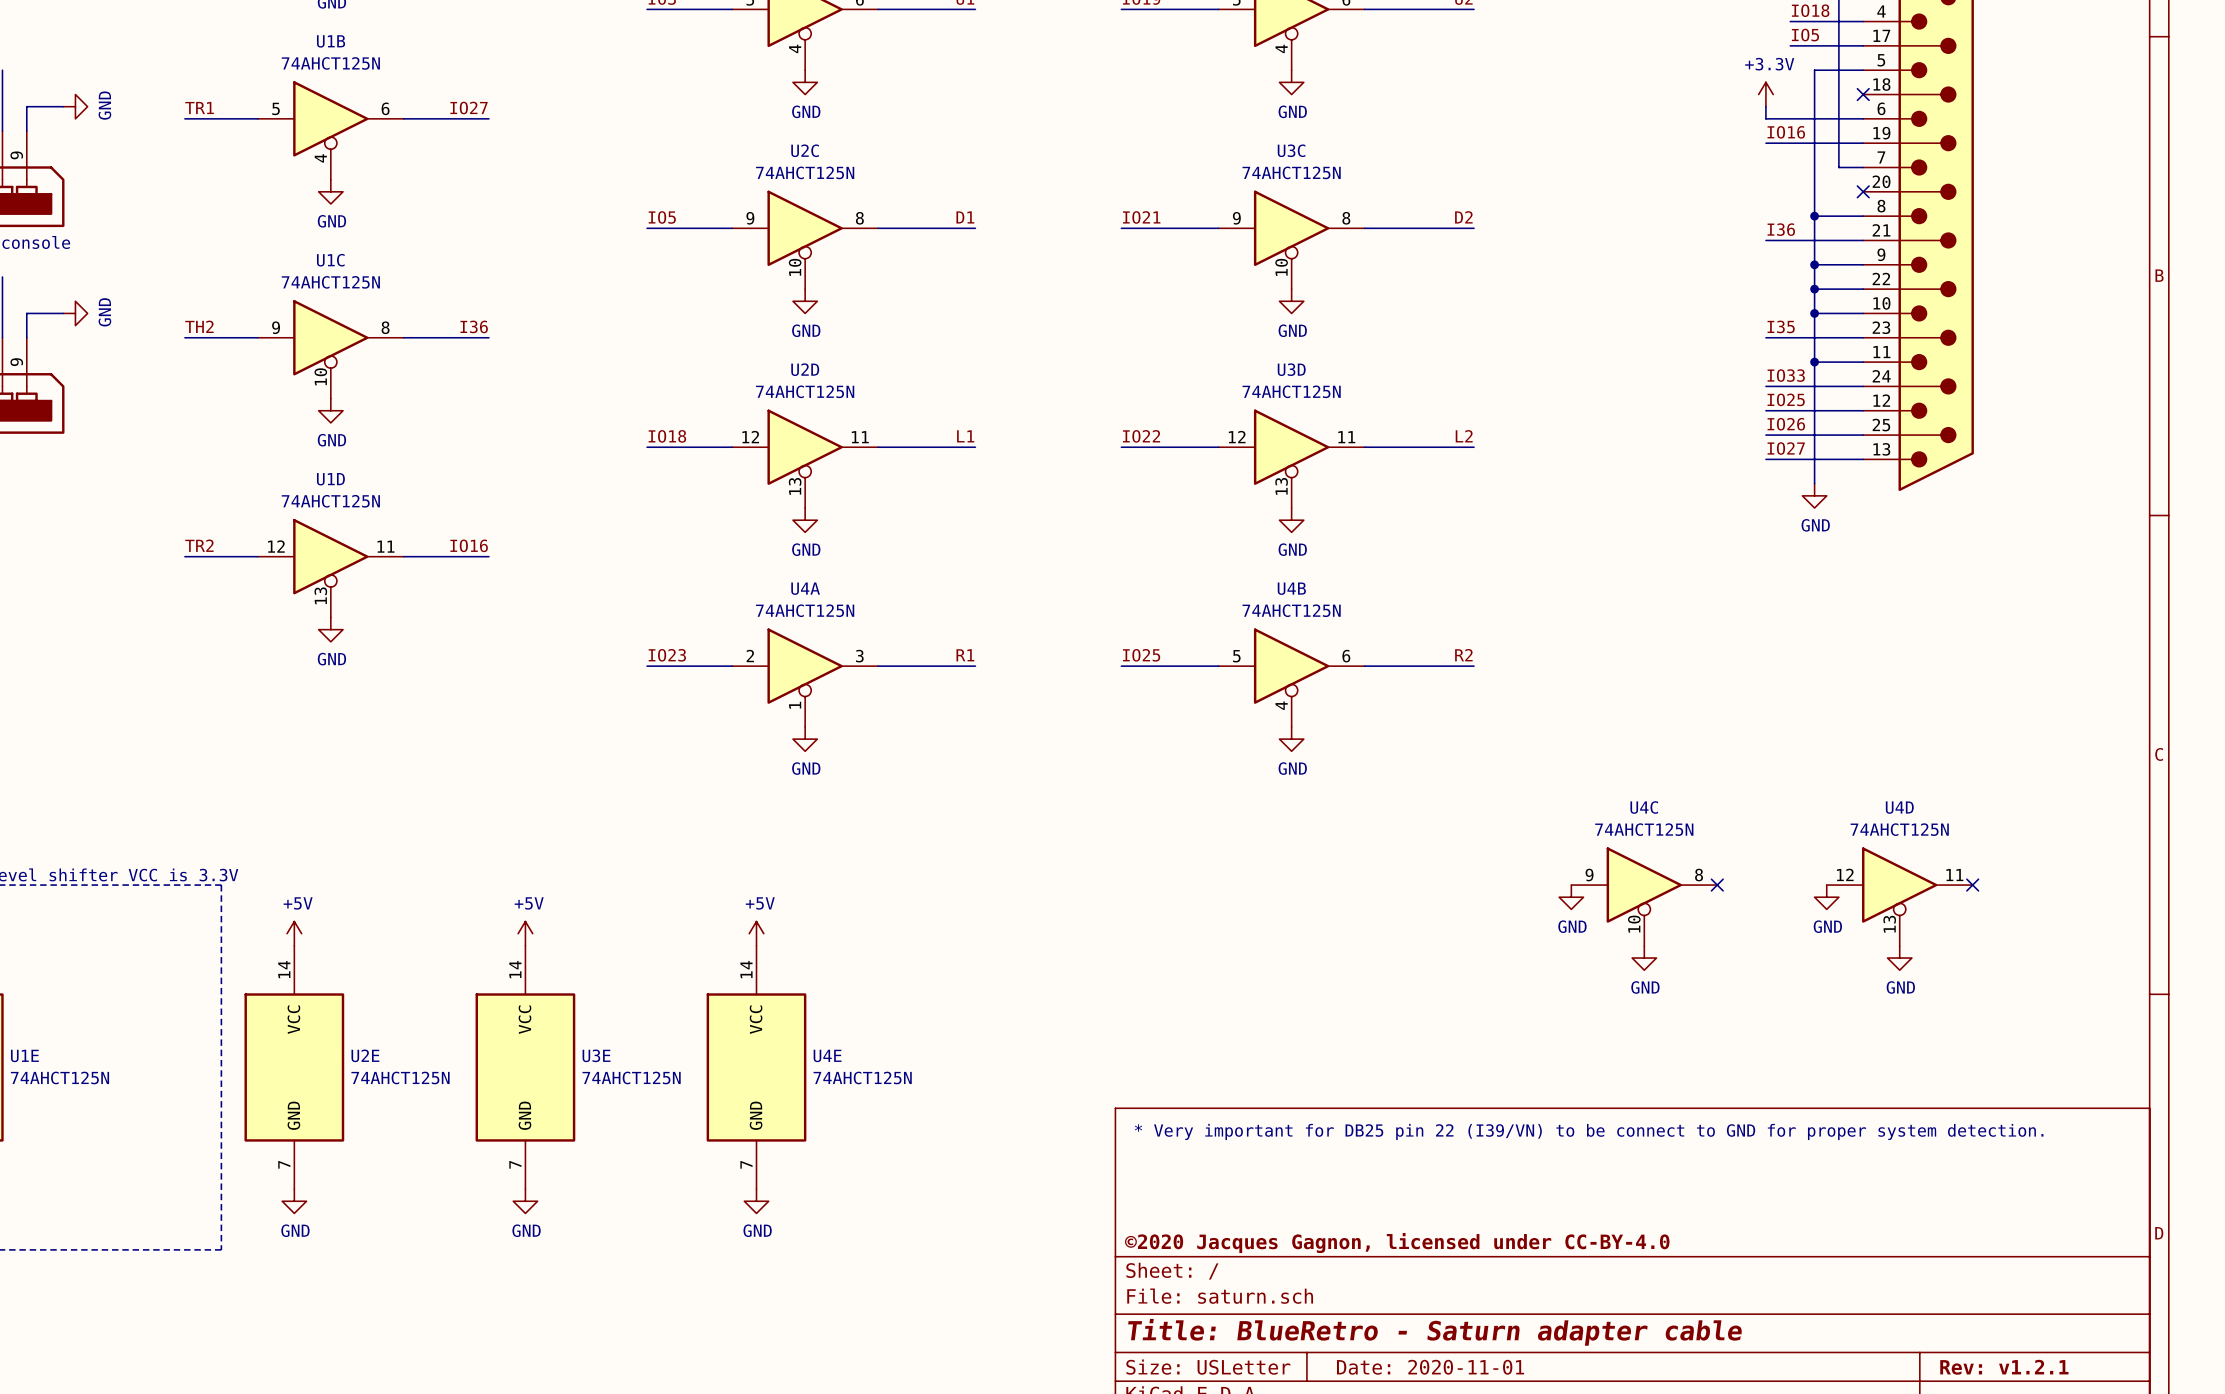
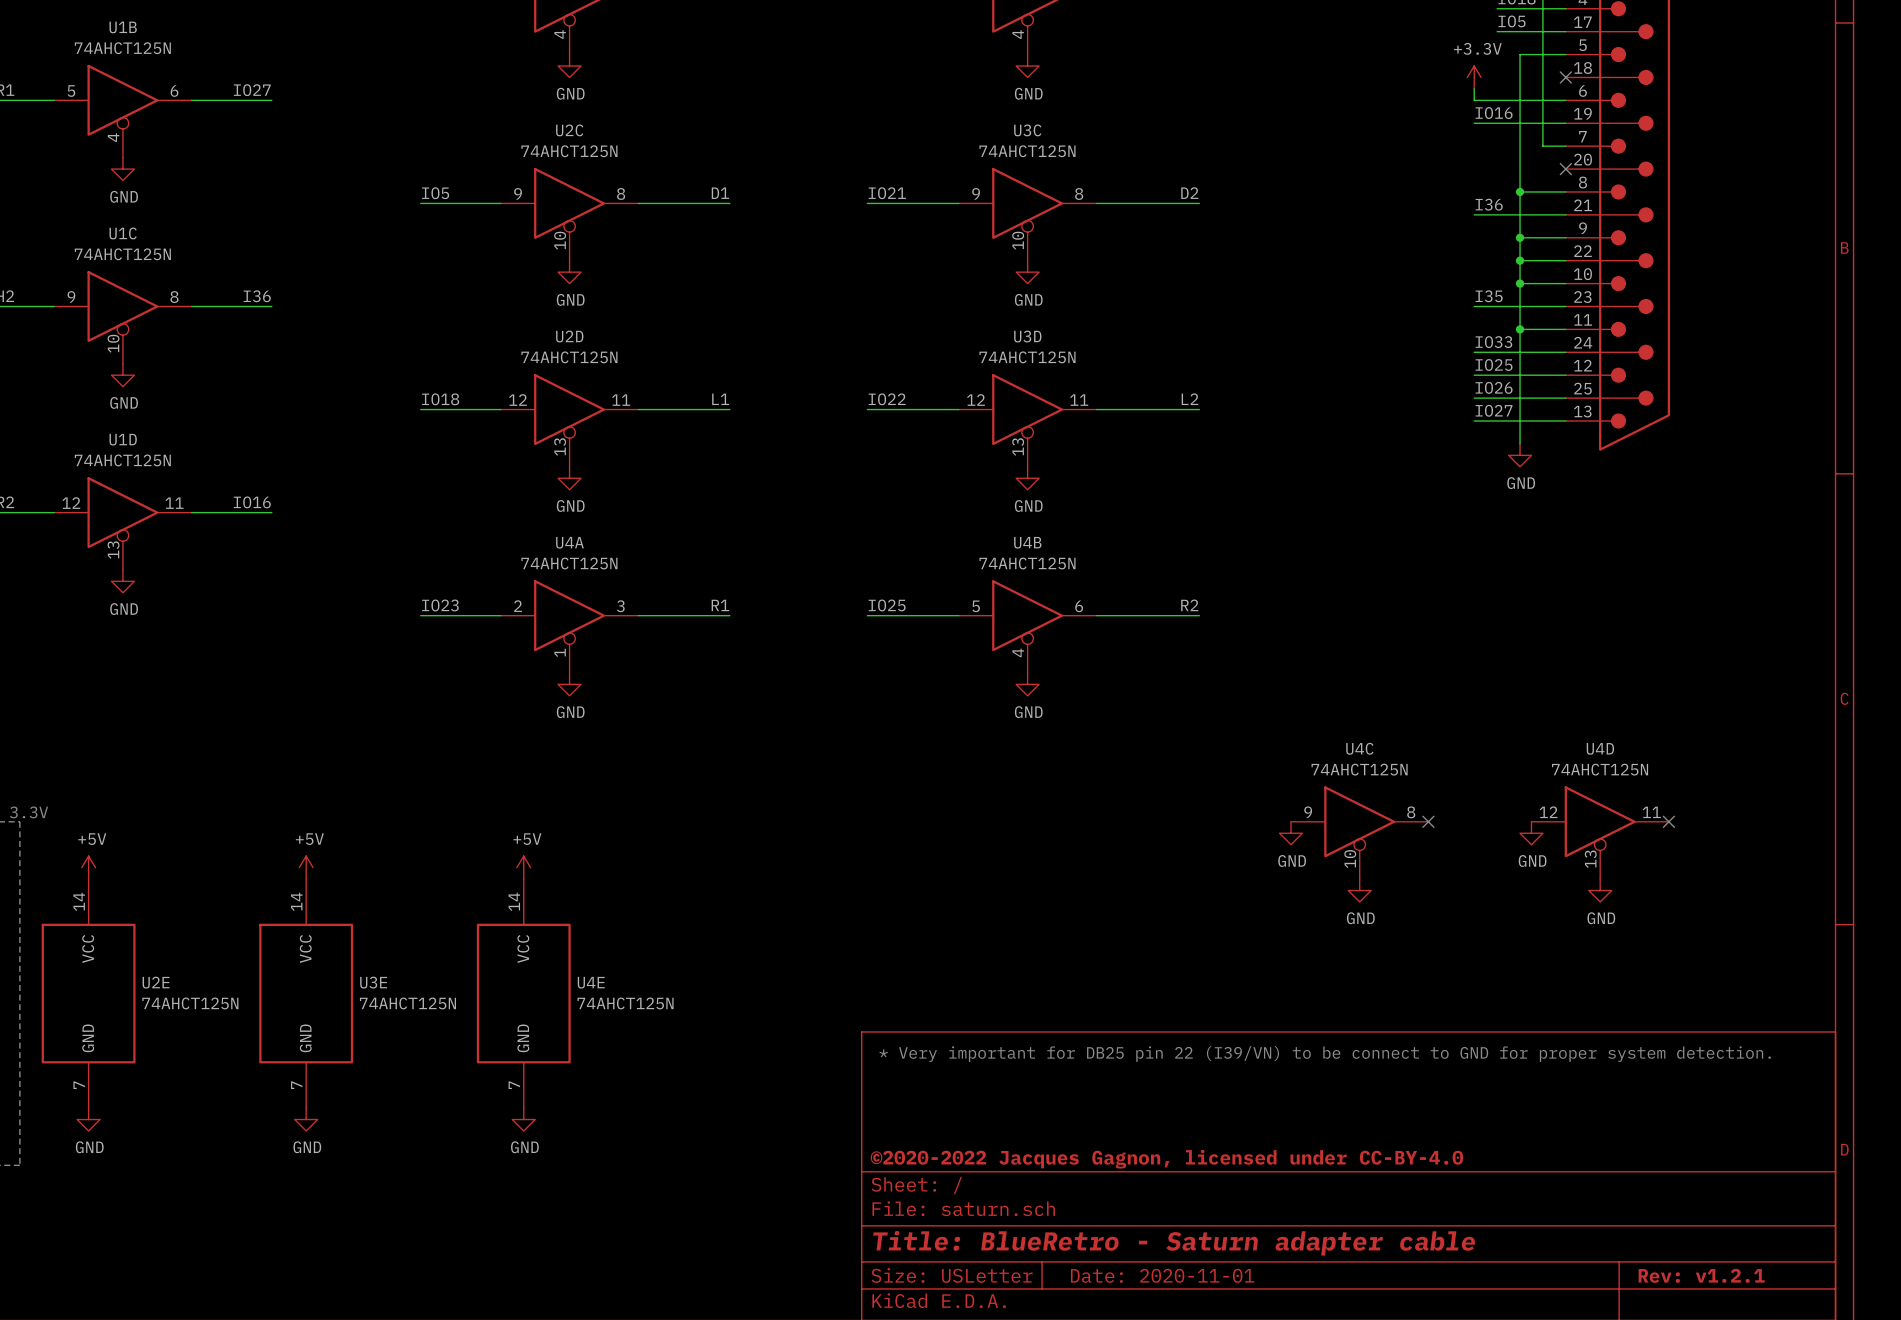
title block: ©2020 Jacques Gagnon, licensed under CC-BY-4.0 (1397, 1243) -> ©2020-2022 Jacques Gagnon, licensed under CC-BY-4.0 (1166, 1159)

